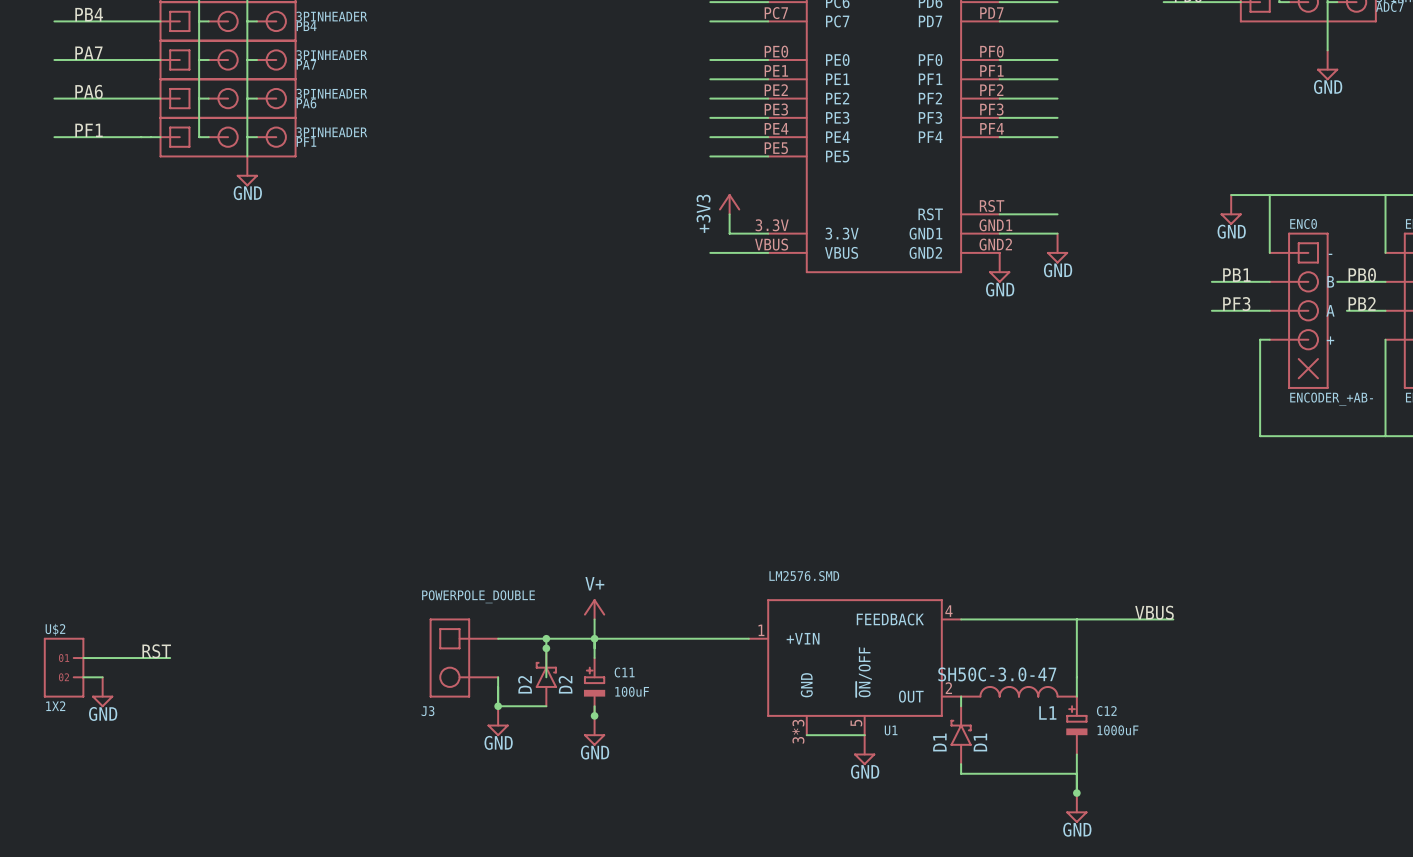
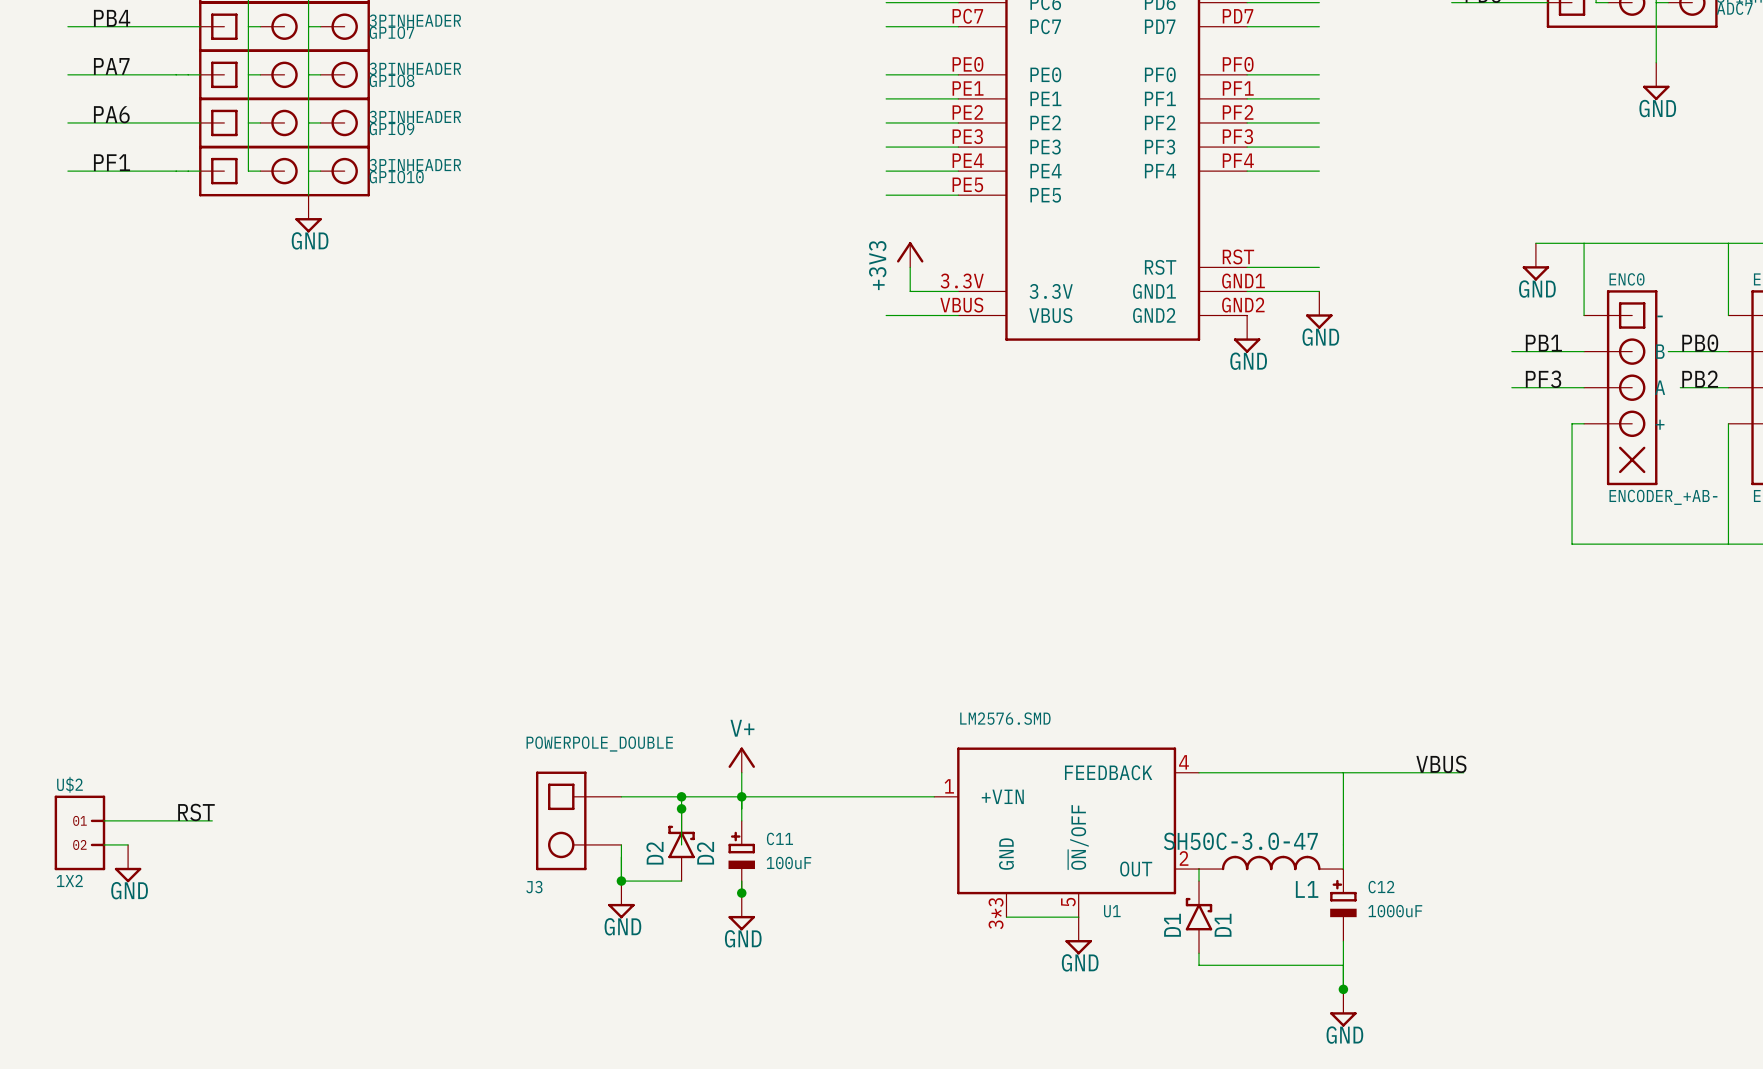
PB4 name: PB4 (306, 26) -> GPIO7 (391, 32)
PA7 name: PA7 (306, 64) -> GPIO8 (392, 80)
PA6 name: PA6 (306, 103) -> GPIO9 (391, 128)
PF1 name: PF1 (306, 141) -> GPIO10 (396, 177)

